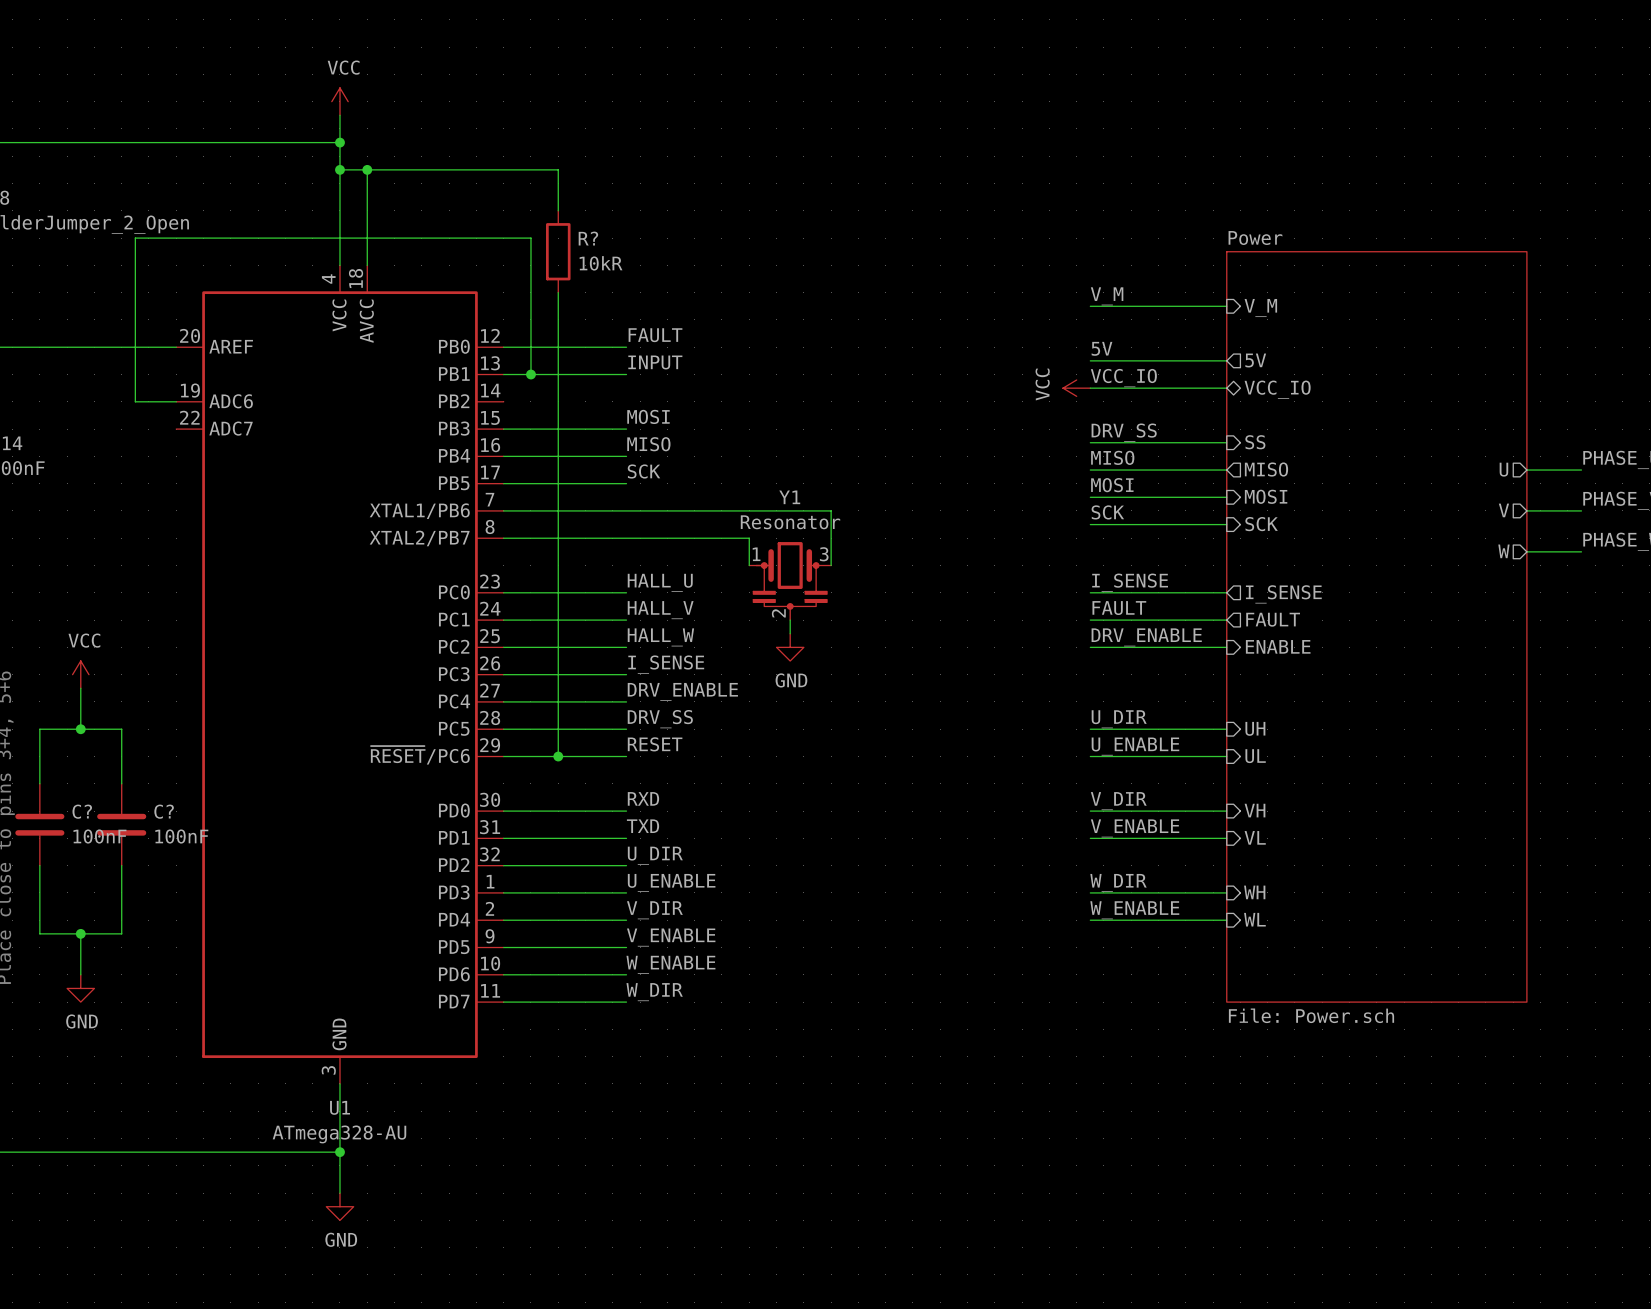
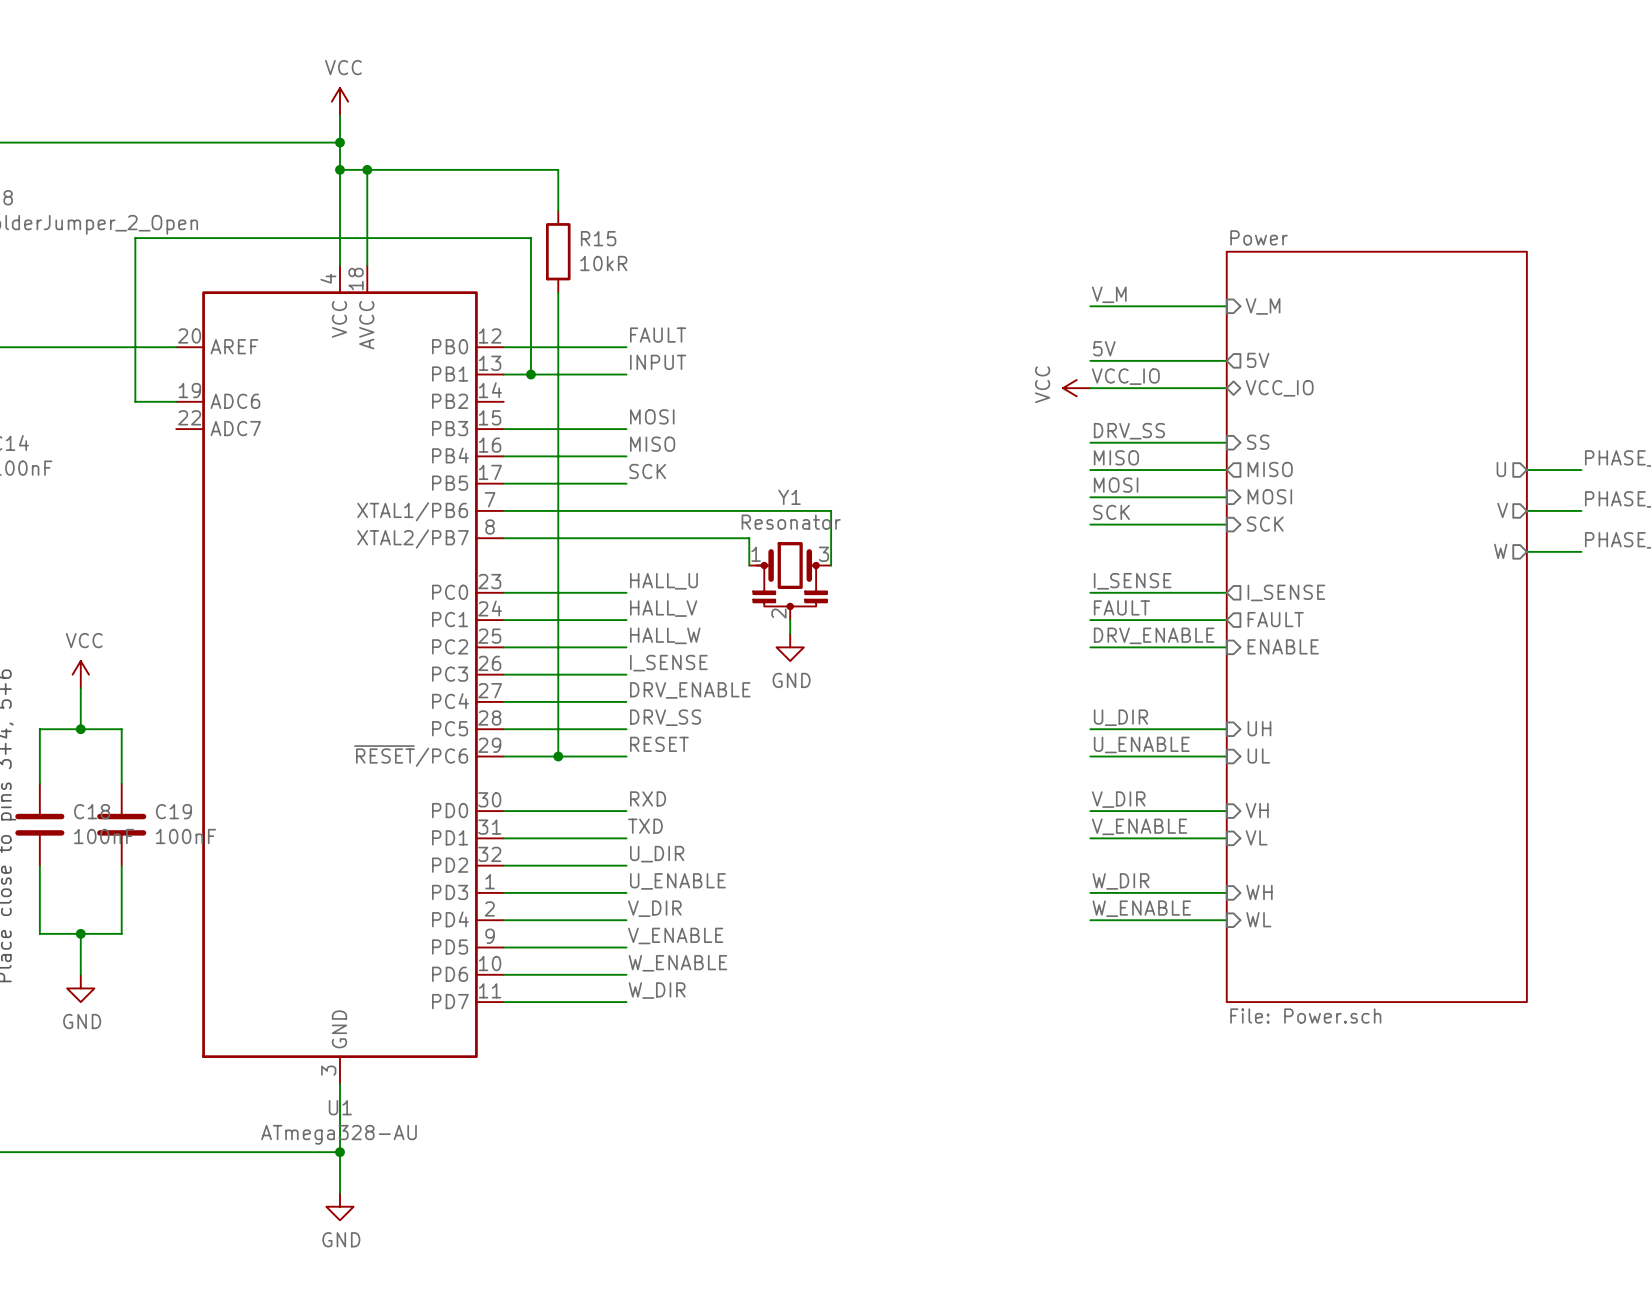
R? name: R? (588, 238) -> R15 (598, 238)
C? name: C? (82, 811) -> C18 (92, 811)
C? name: C? (164, 811) -> C19 (173, 811)

